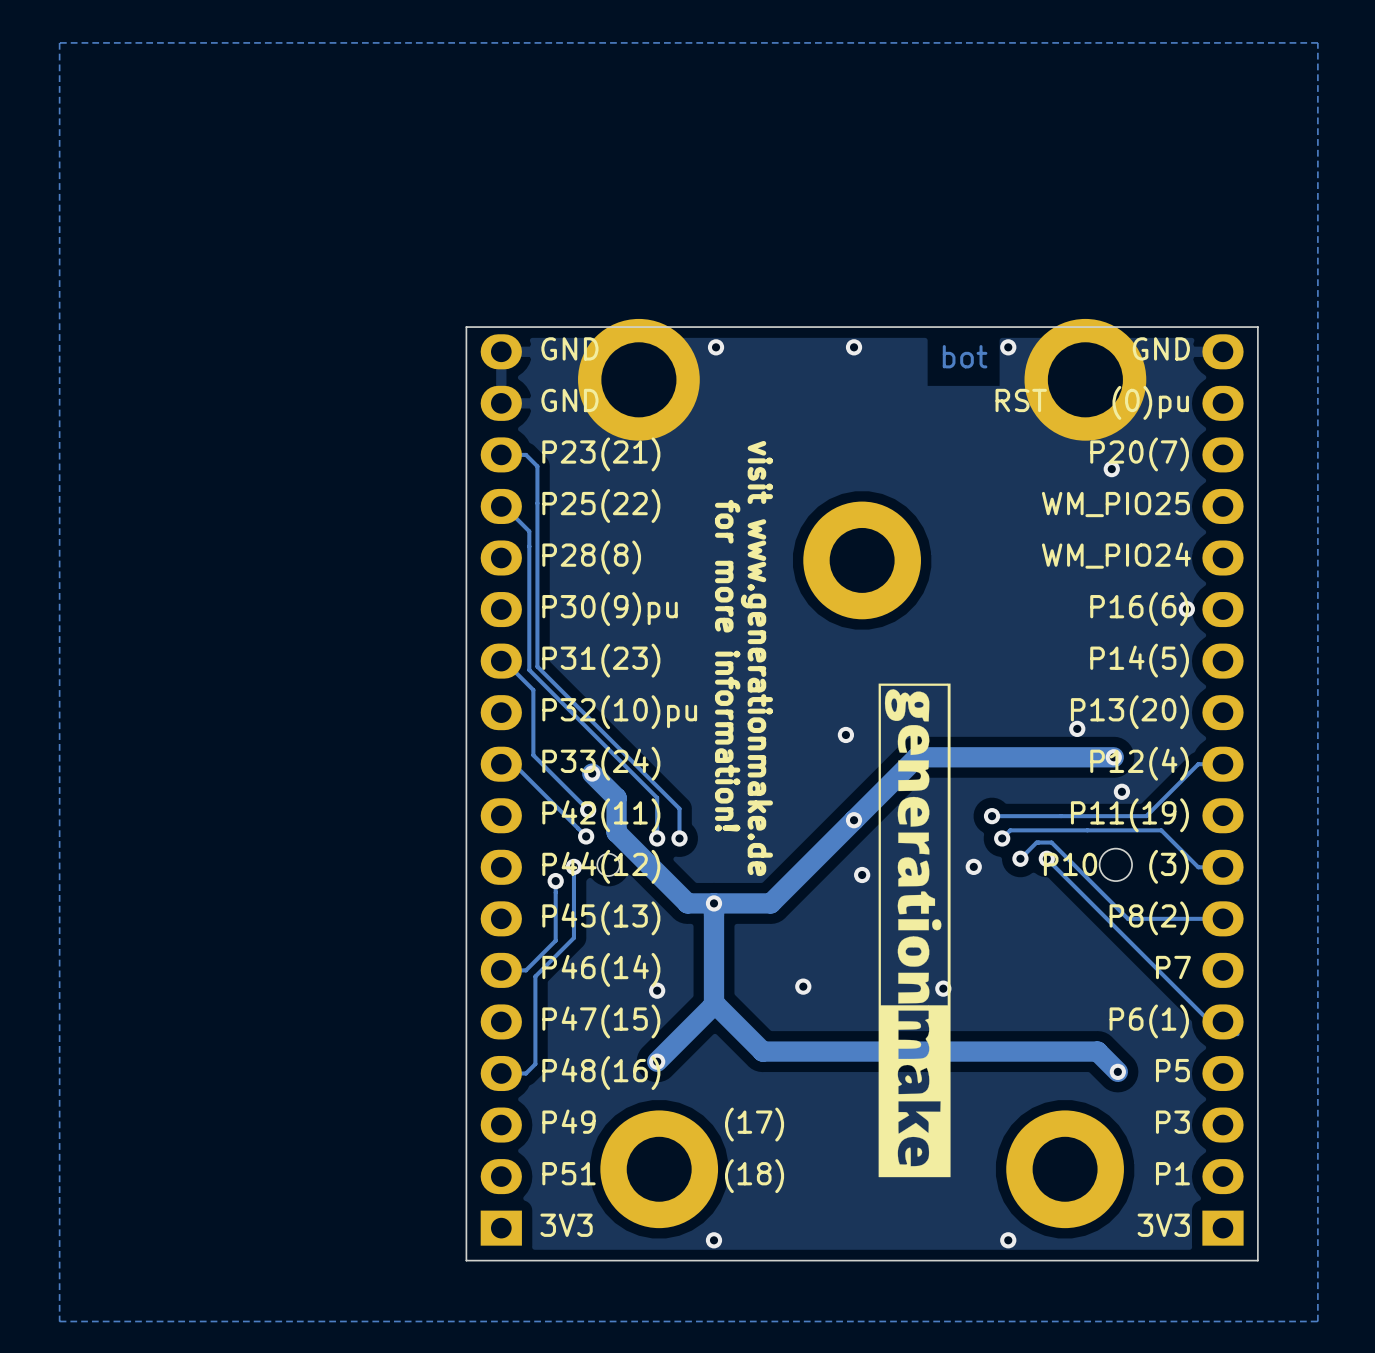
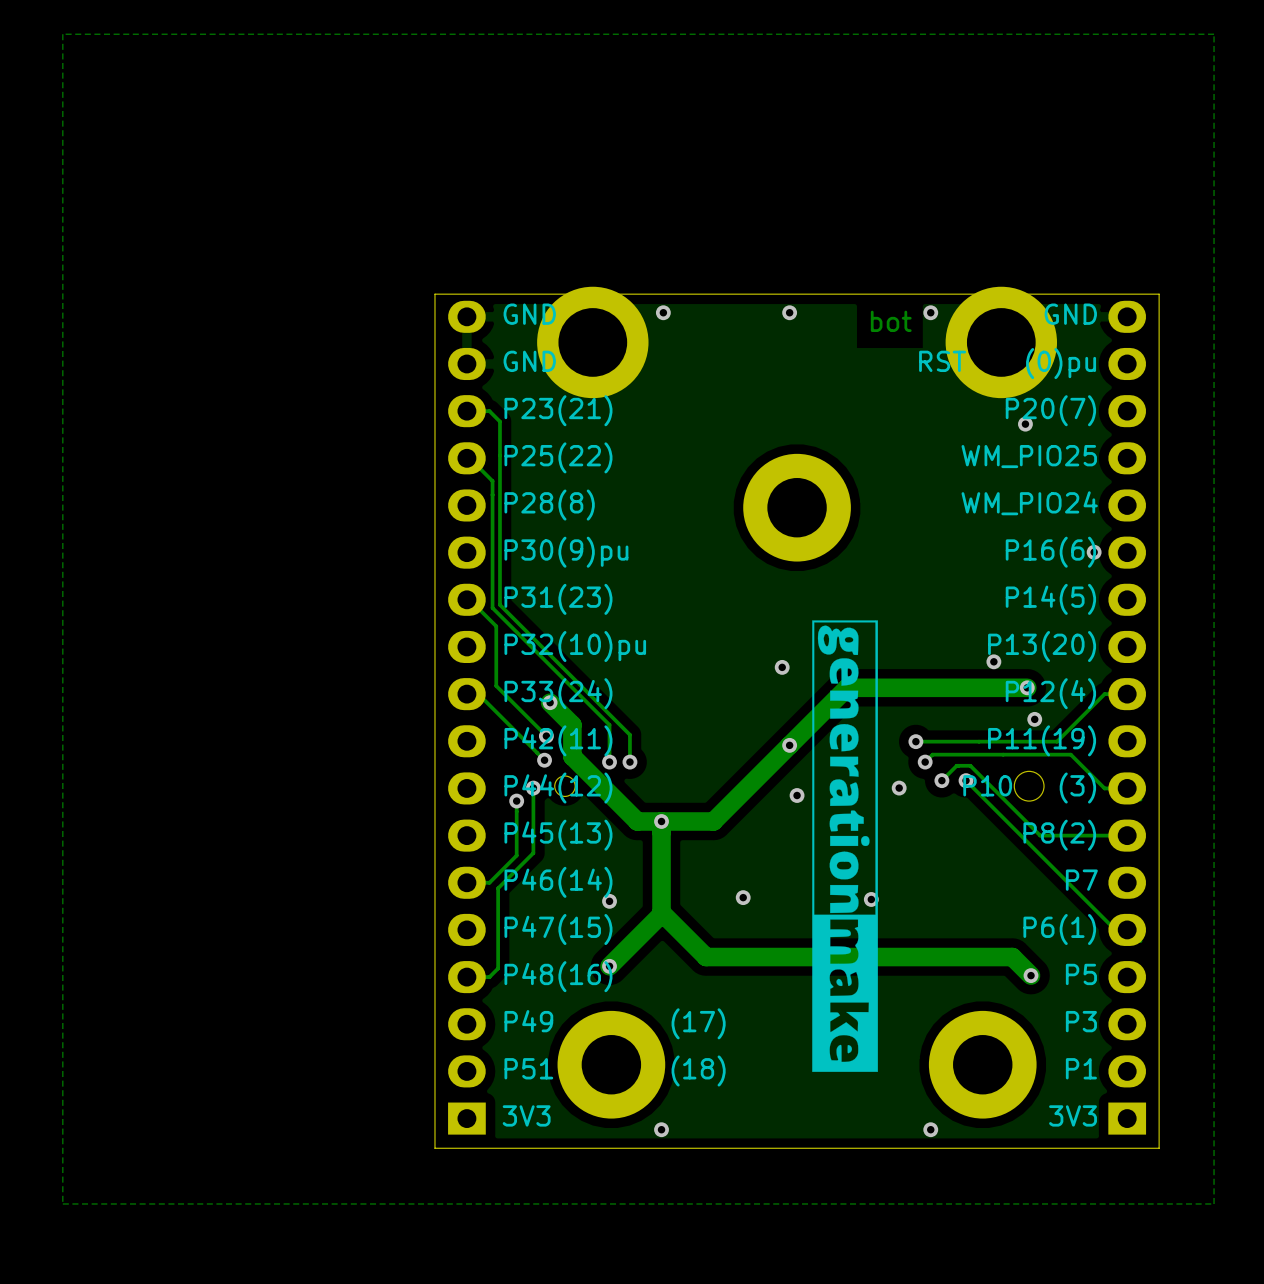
text: visit www.generationmake.de (756, 658) -> none
text: for more information! (727, 665) -> none

